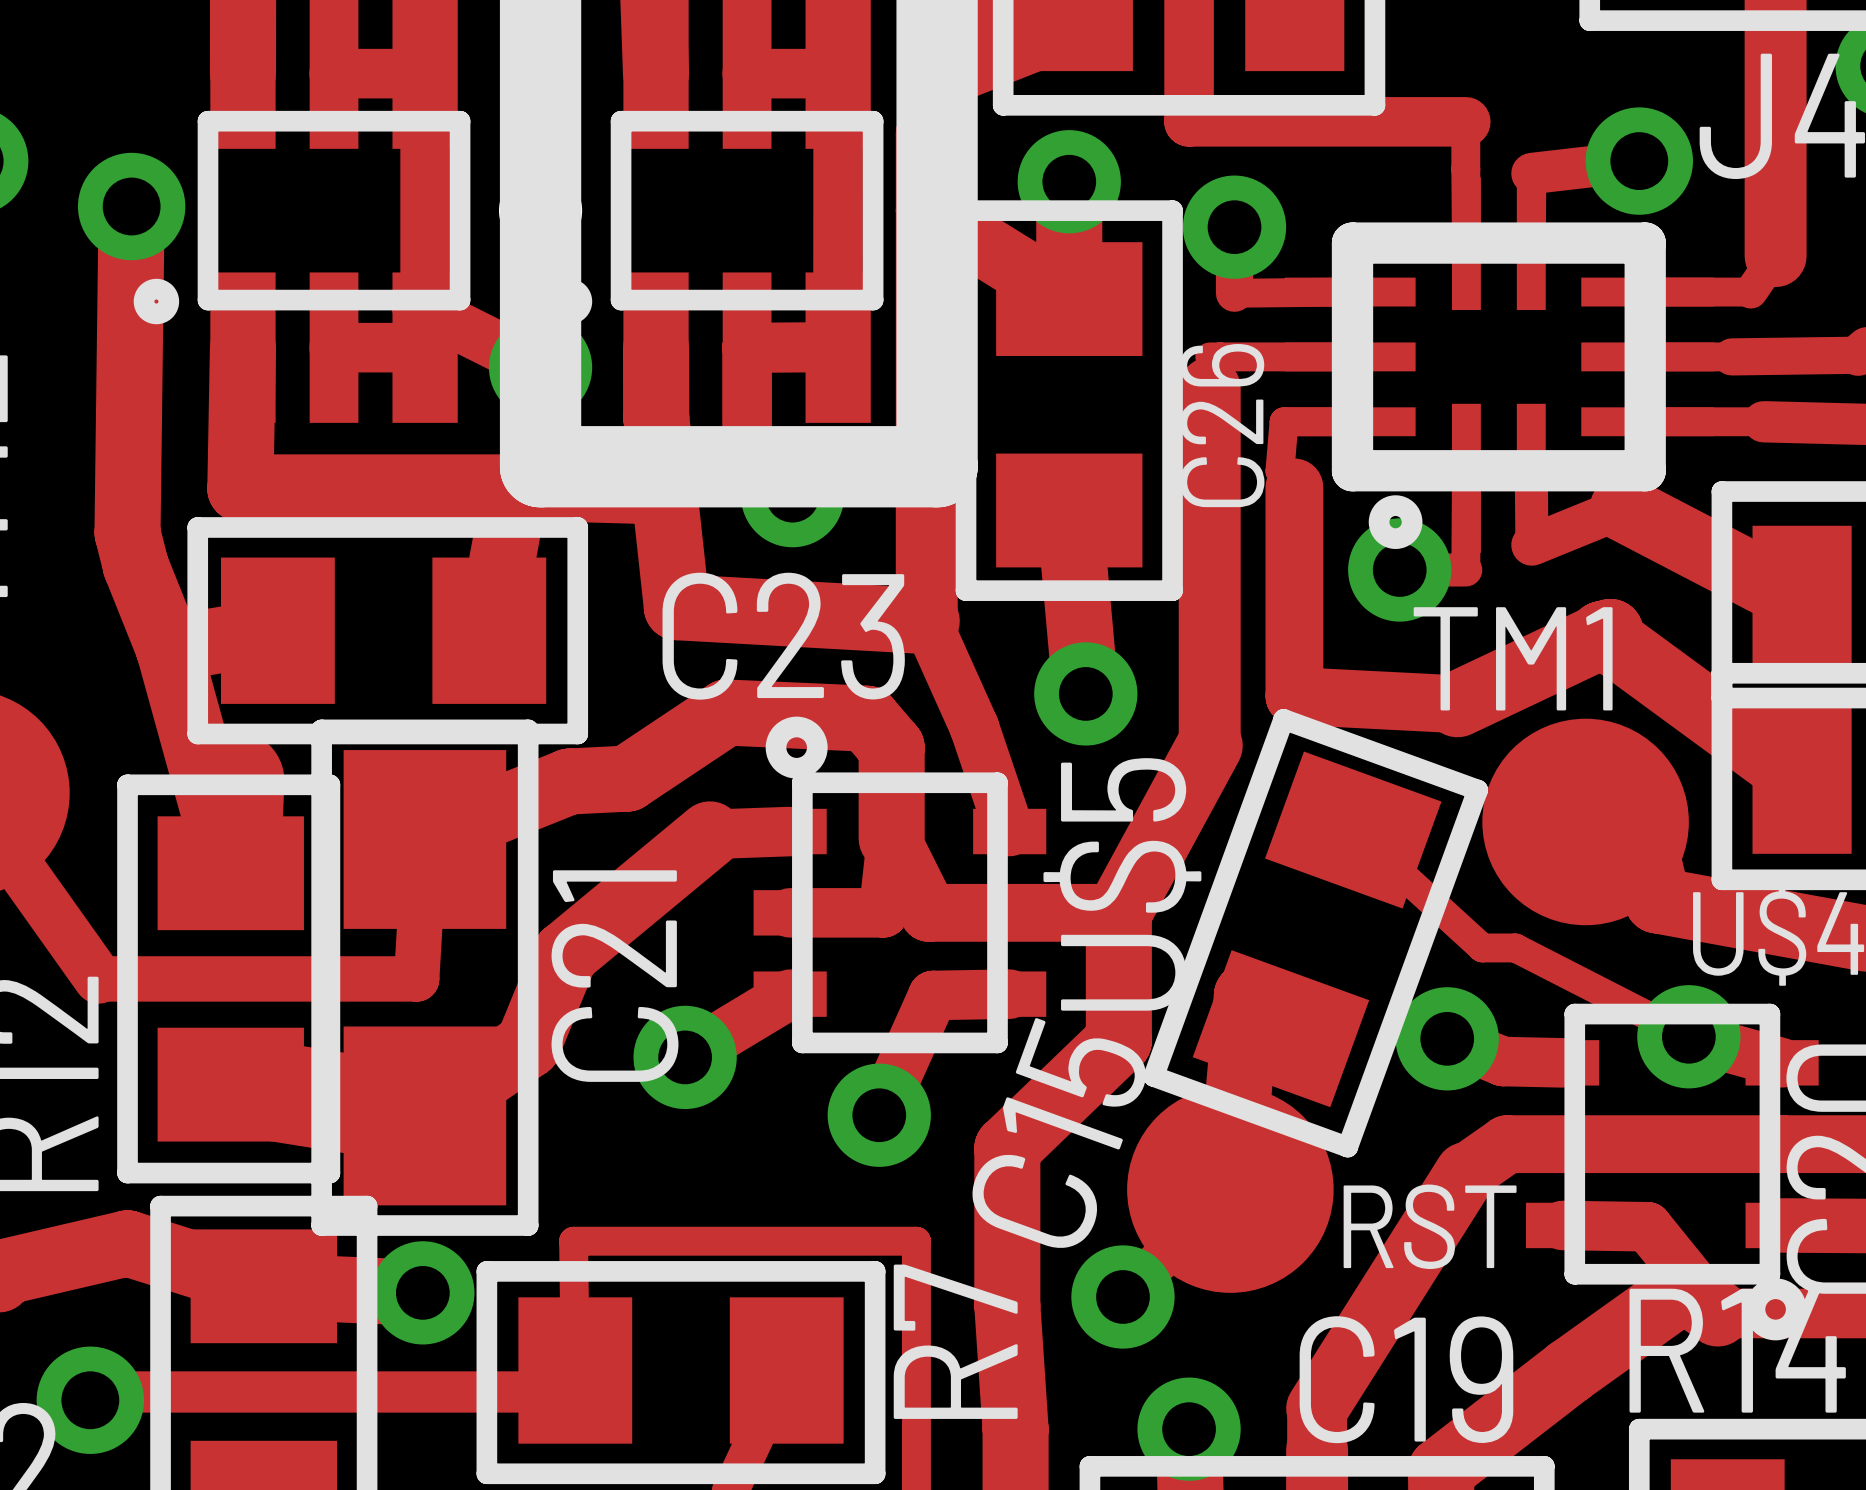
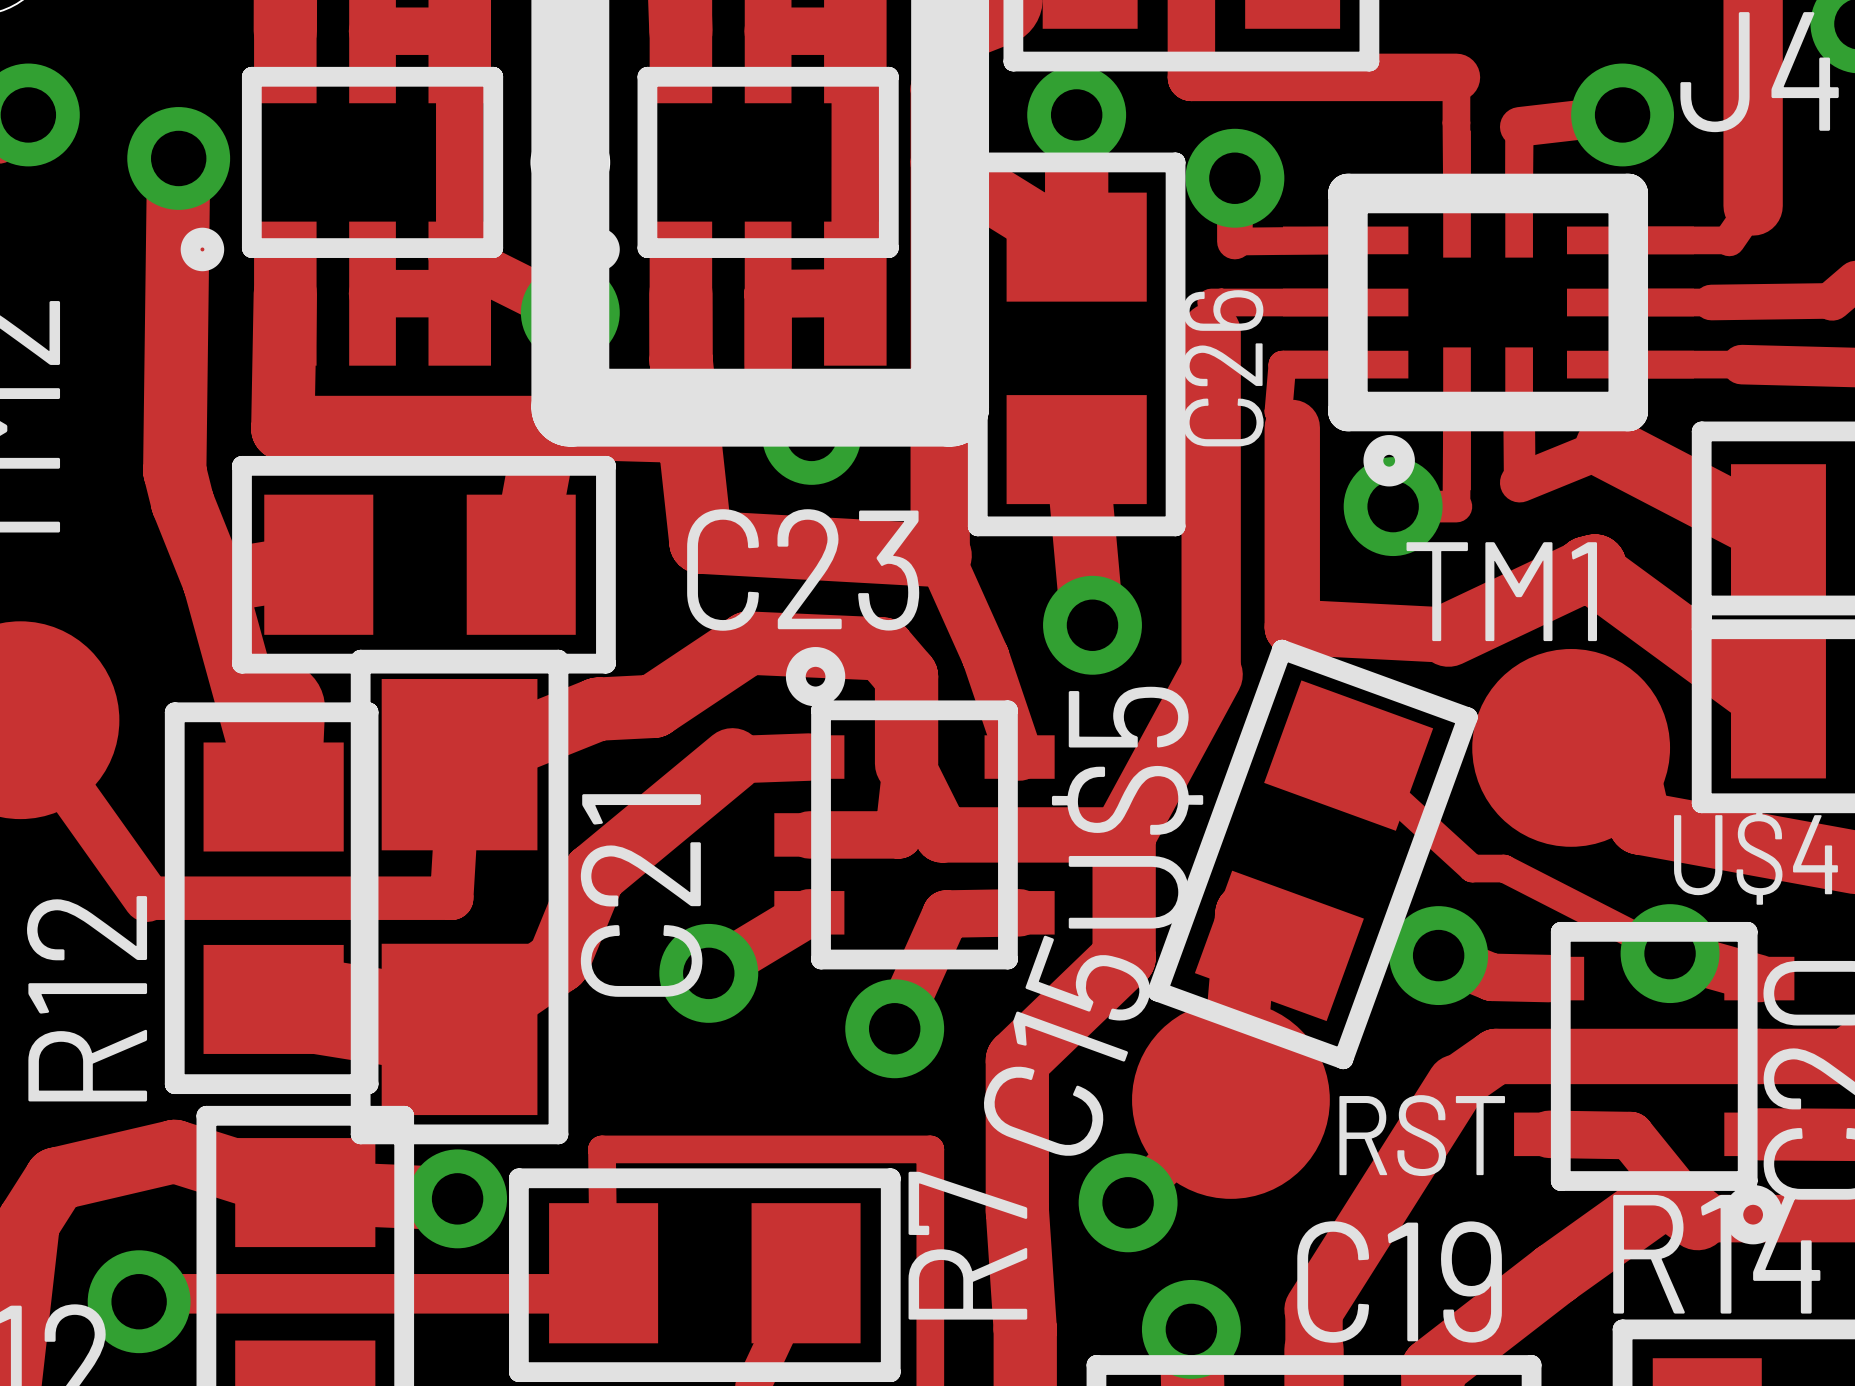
via position: (1069, 181) -> (1076, 114)

